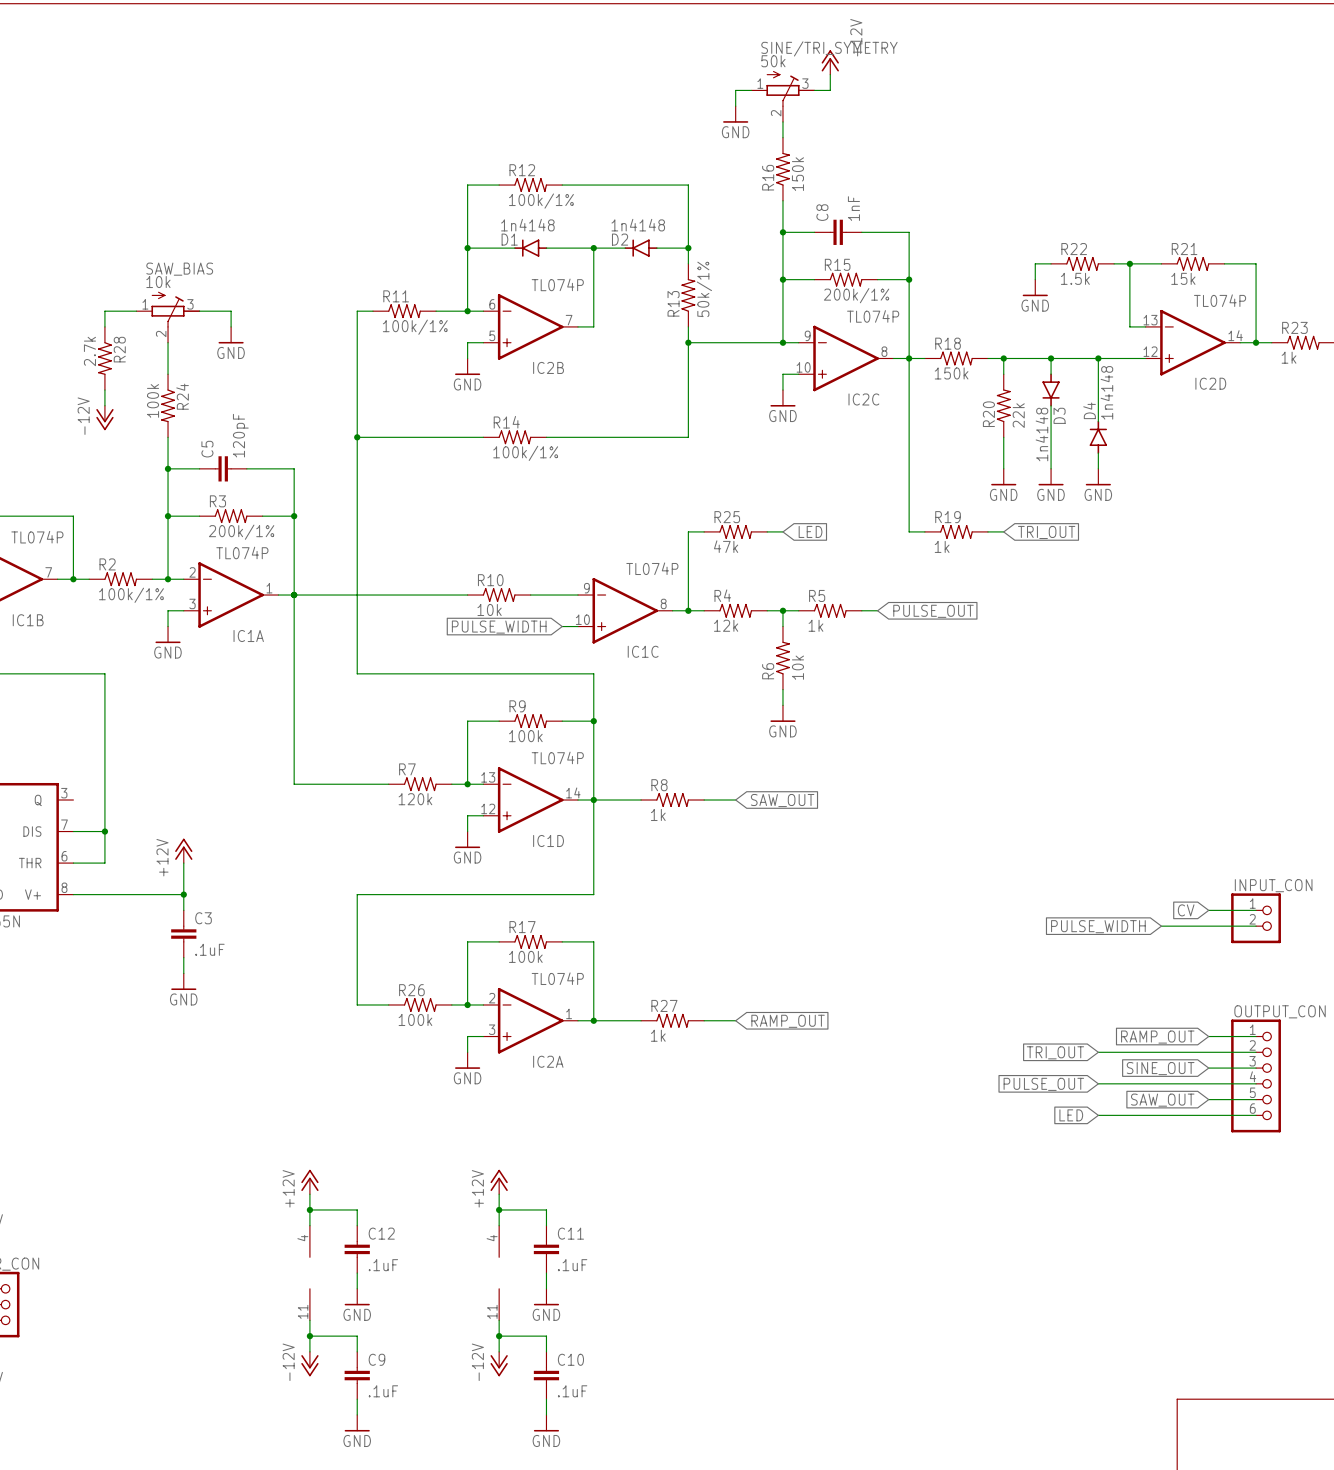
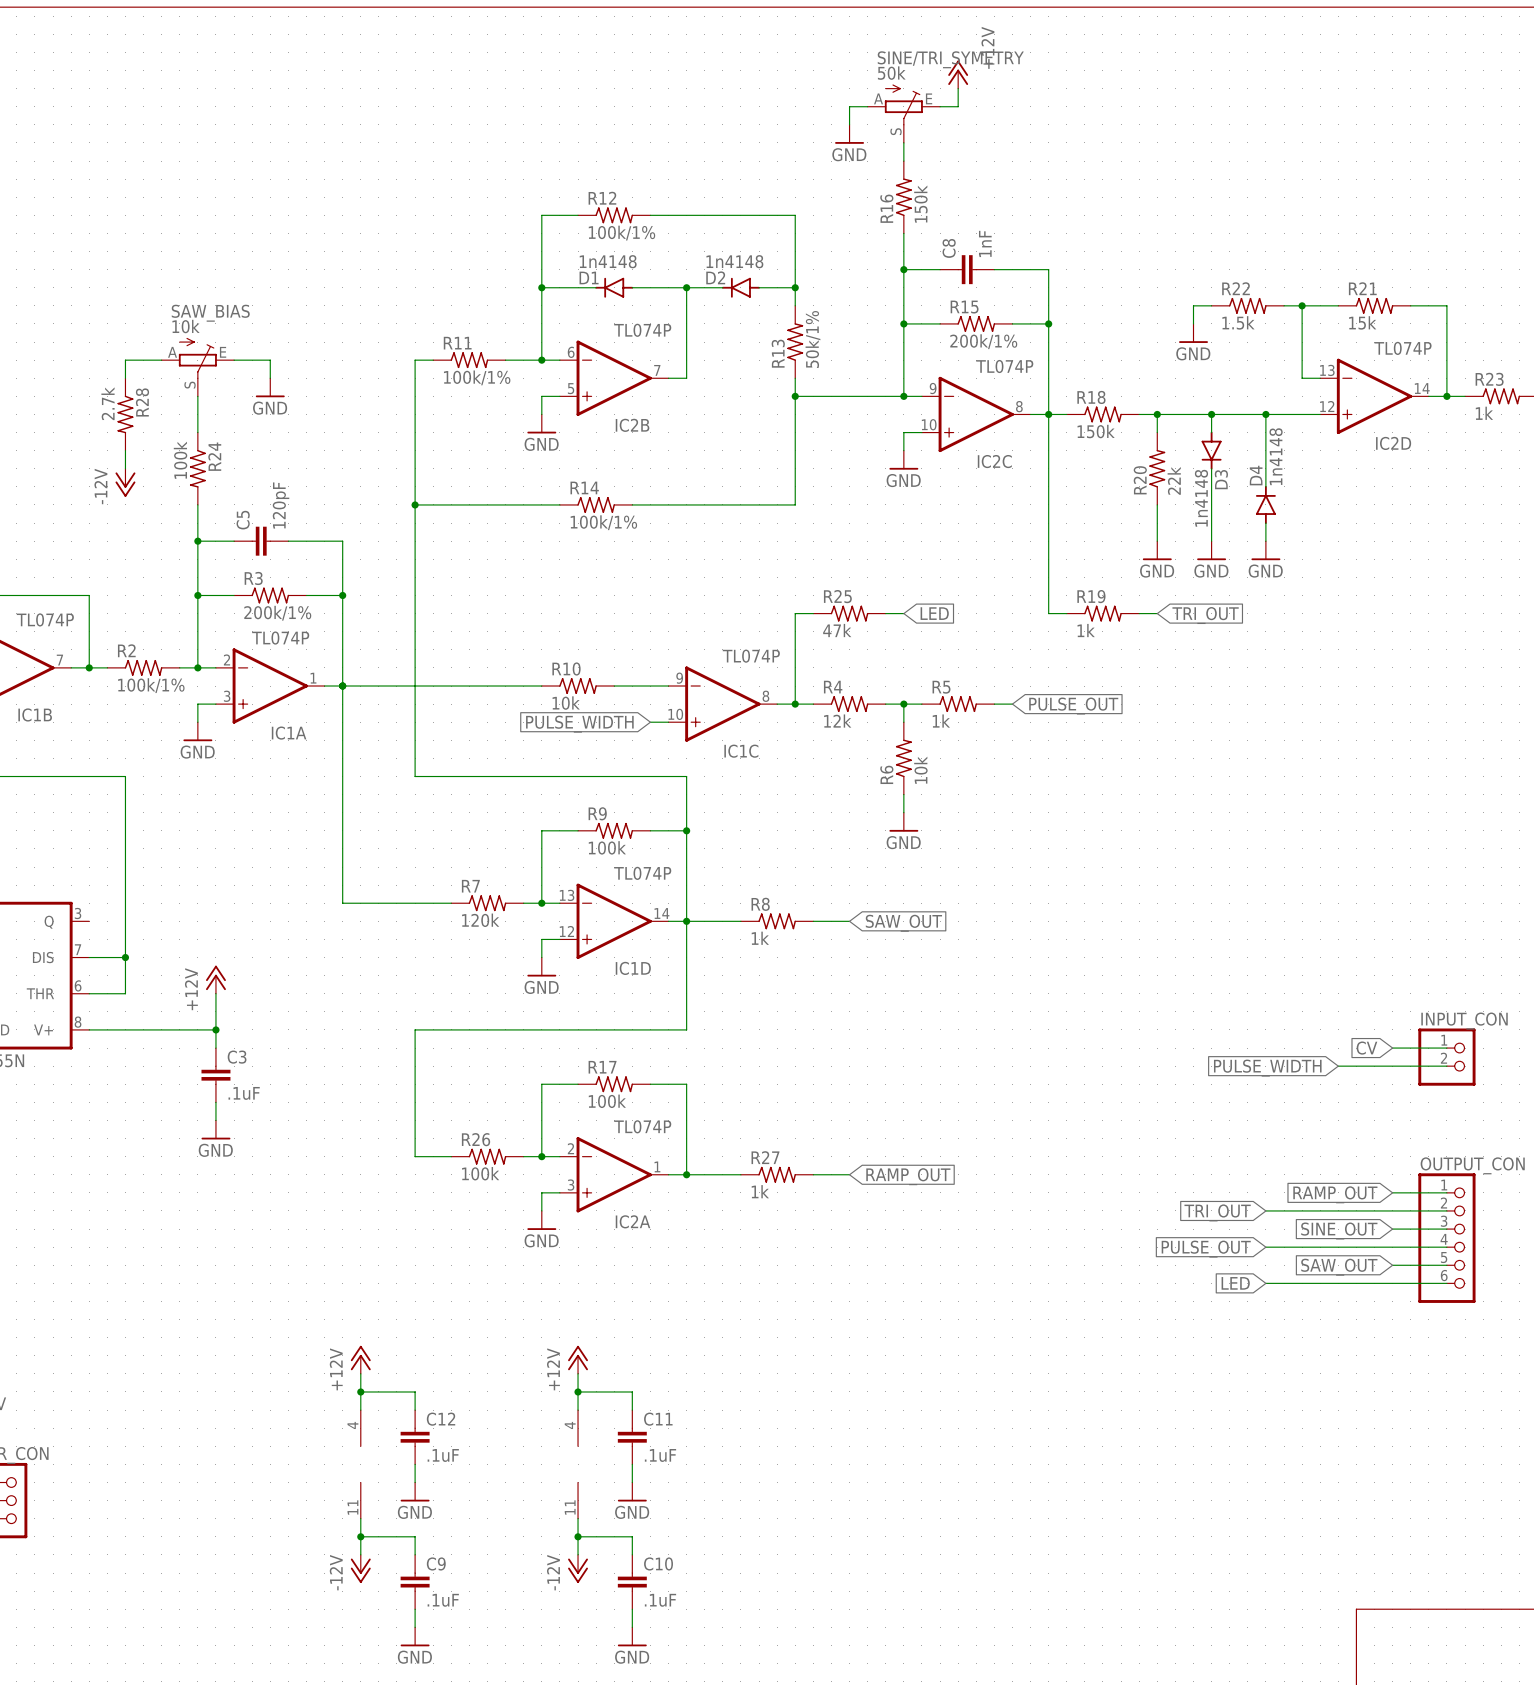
SINE/TRI_SYMETRY symbol: [751, 71, 815, 122] -> [867, 84, 941, 143]
SAW_BIAS symbol: [136, 291, 201, 343] -> [161, 337, 235, 397]

